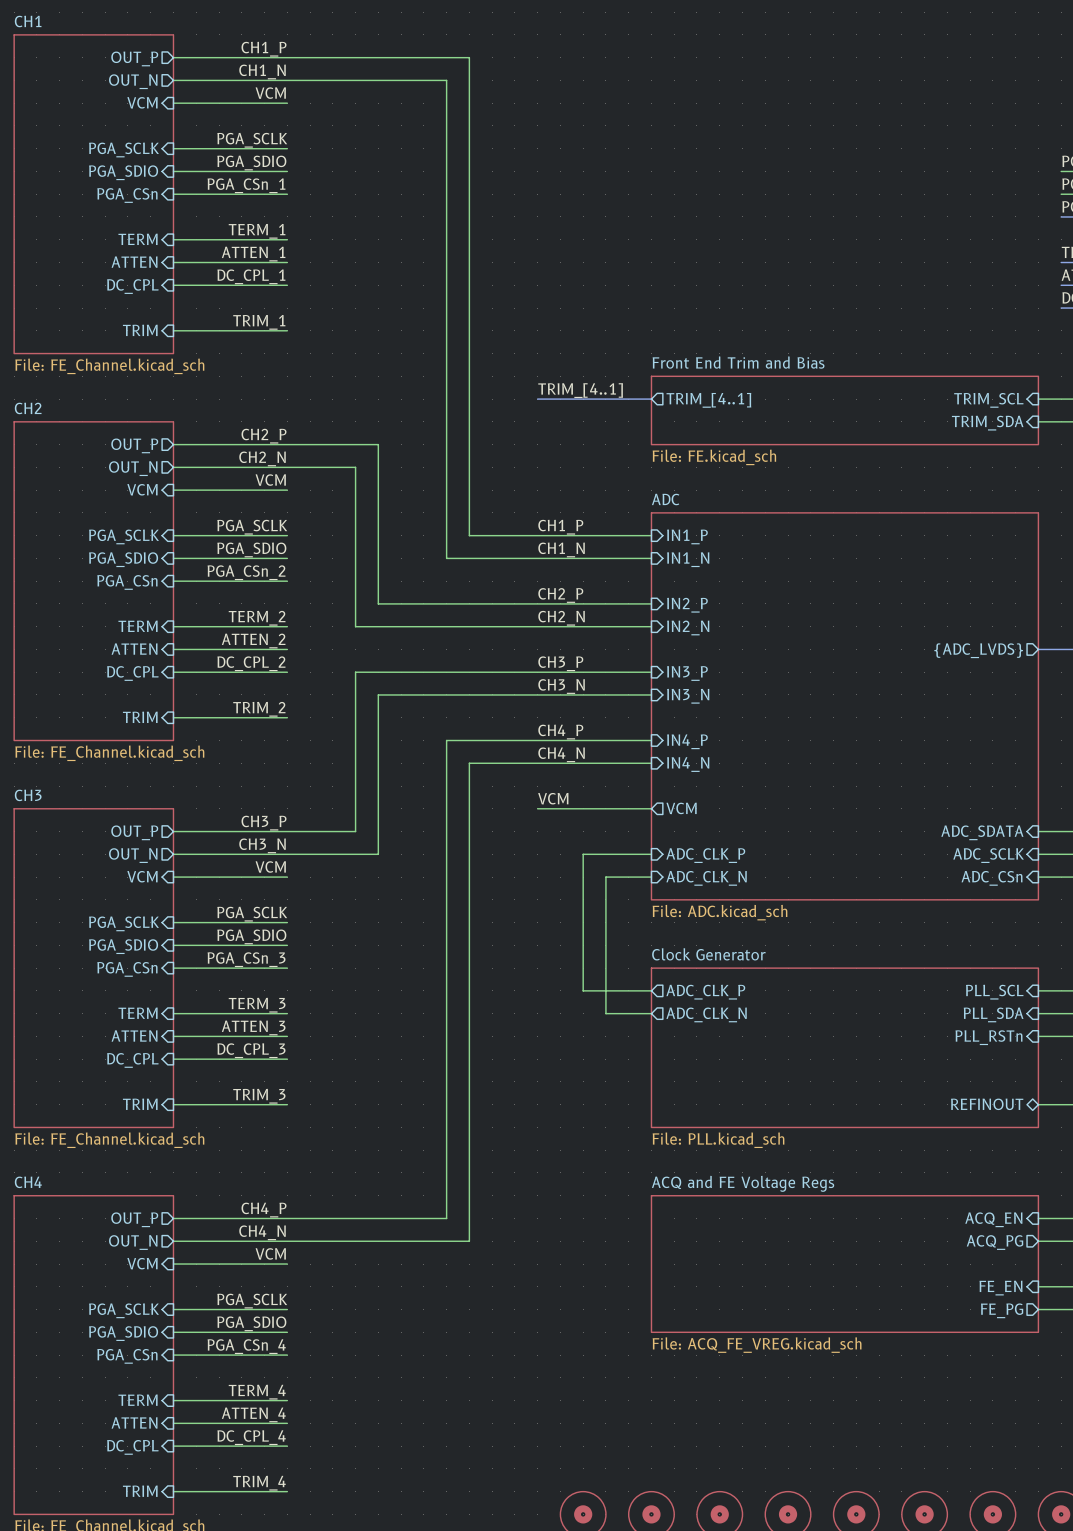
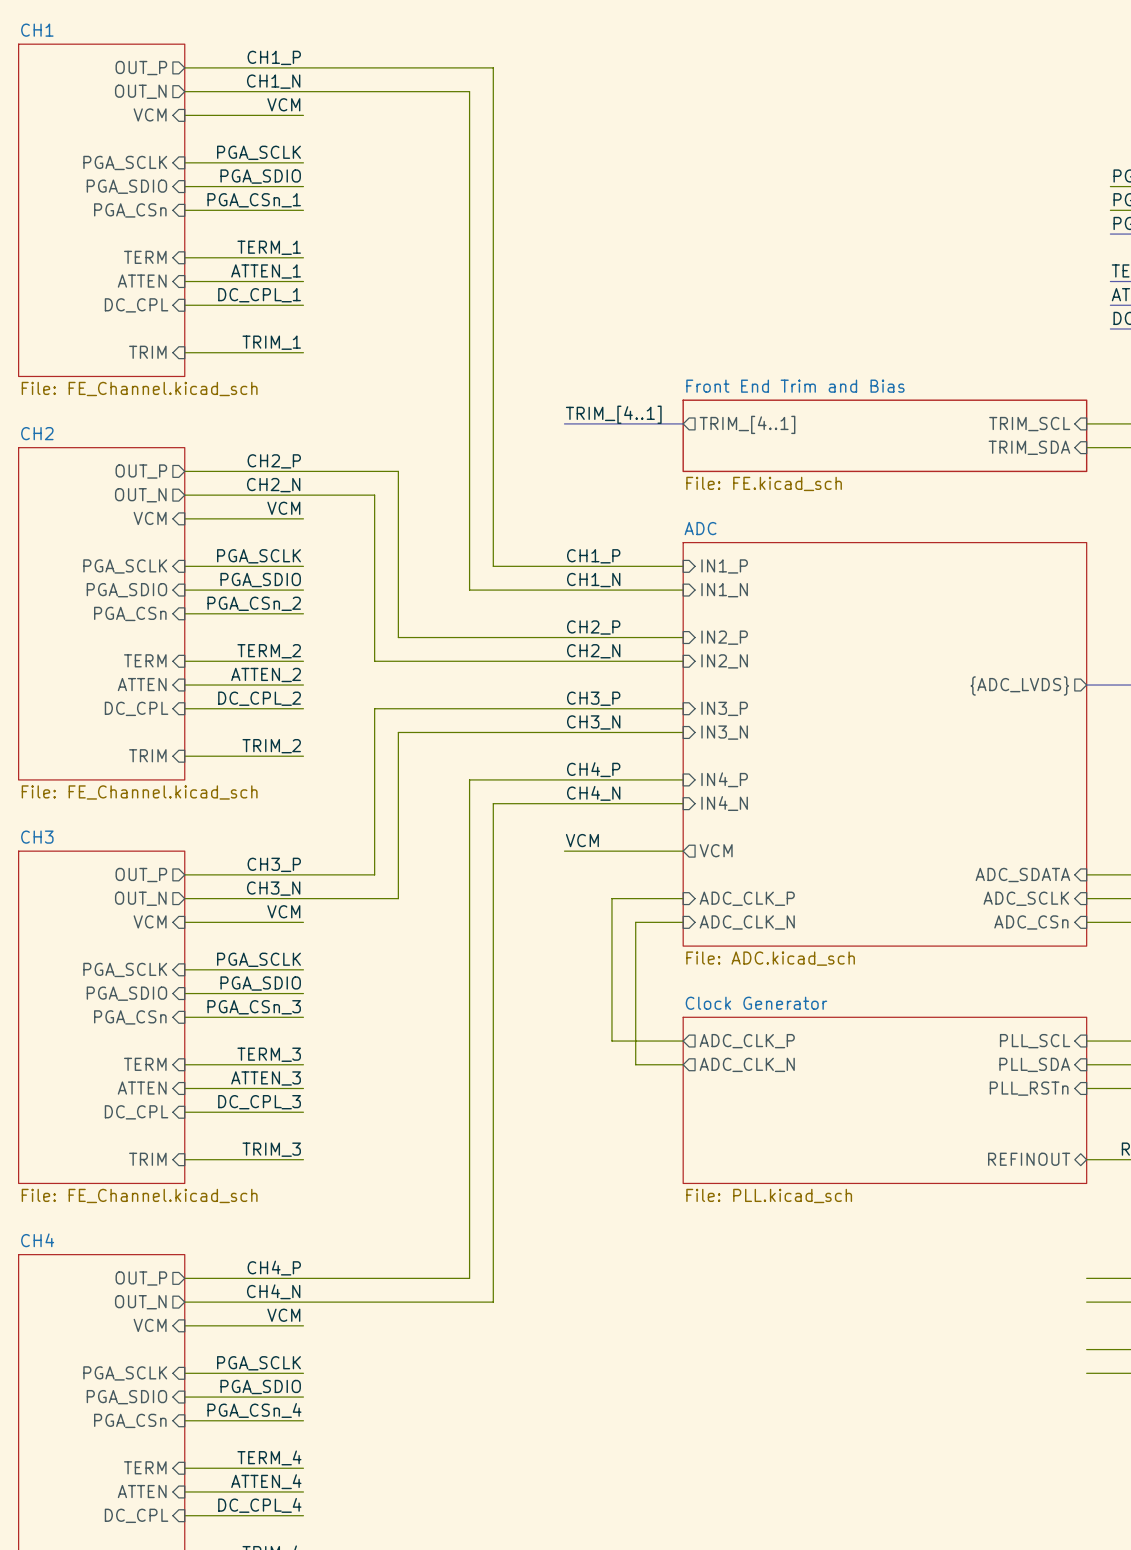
sheet pin: ACQ_EN (993, 1219) -> none
sheet pin: ACQ_PG (994, 1242) -> none
sheet ACQ and FE Voltage Regs: File: ACQ_FE_VREG.kicad_sch (844, 1264) -> none
sheet pin: FE_EN (1000, 1288) -> none
sheet pin: FE_PG (1002, 1310) -> none

